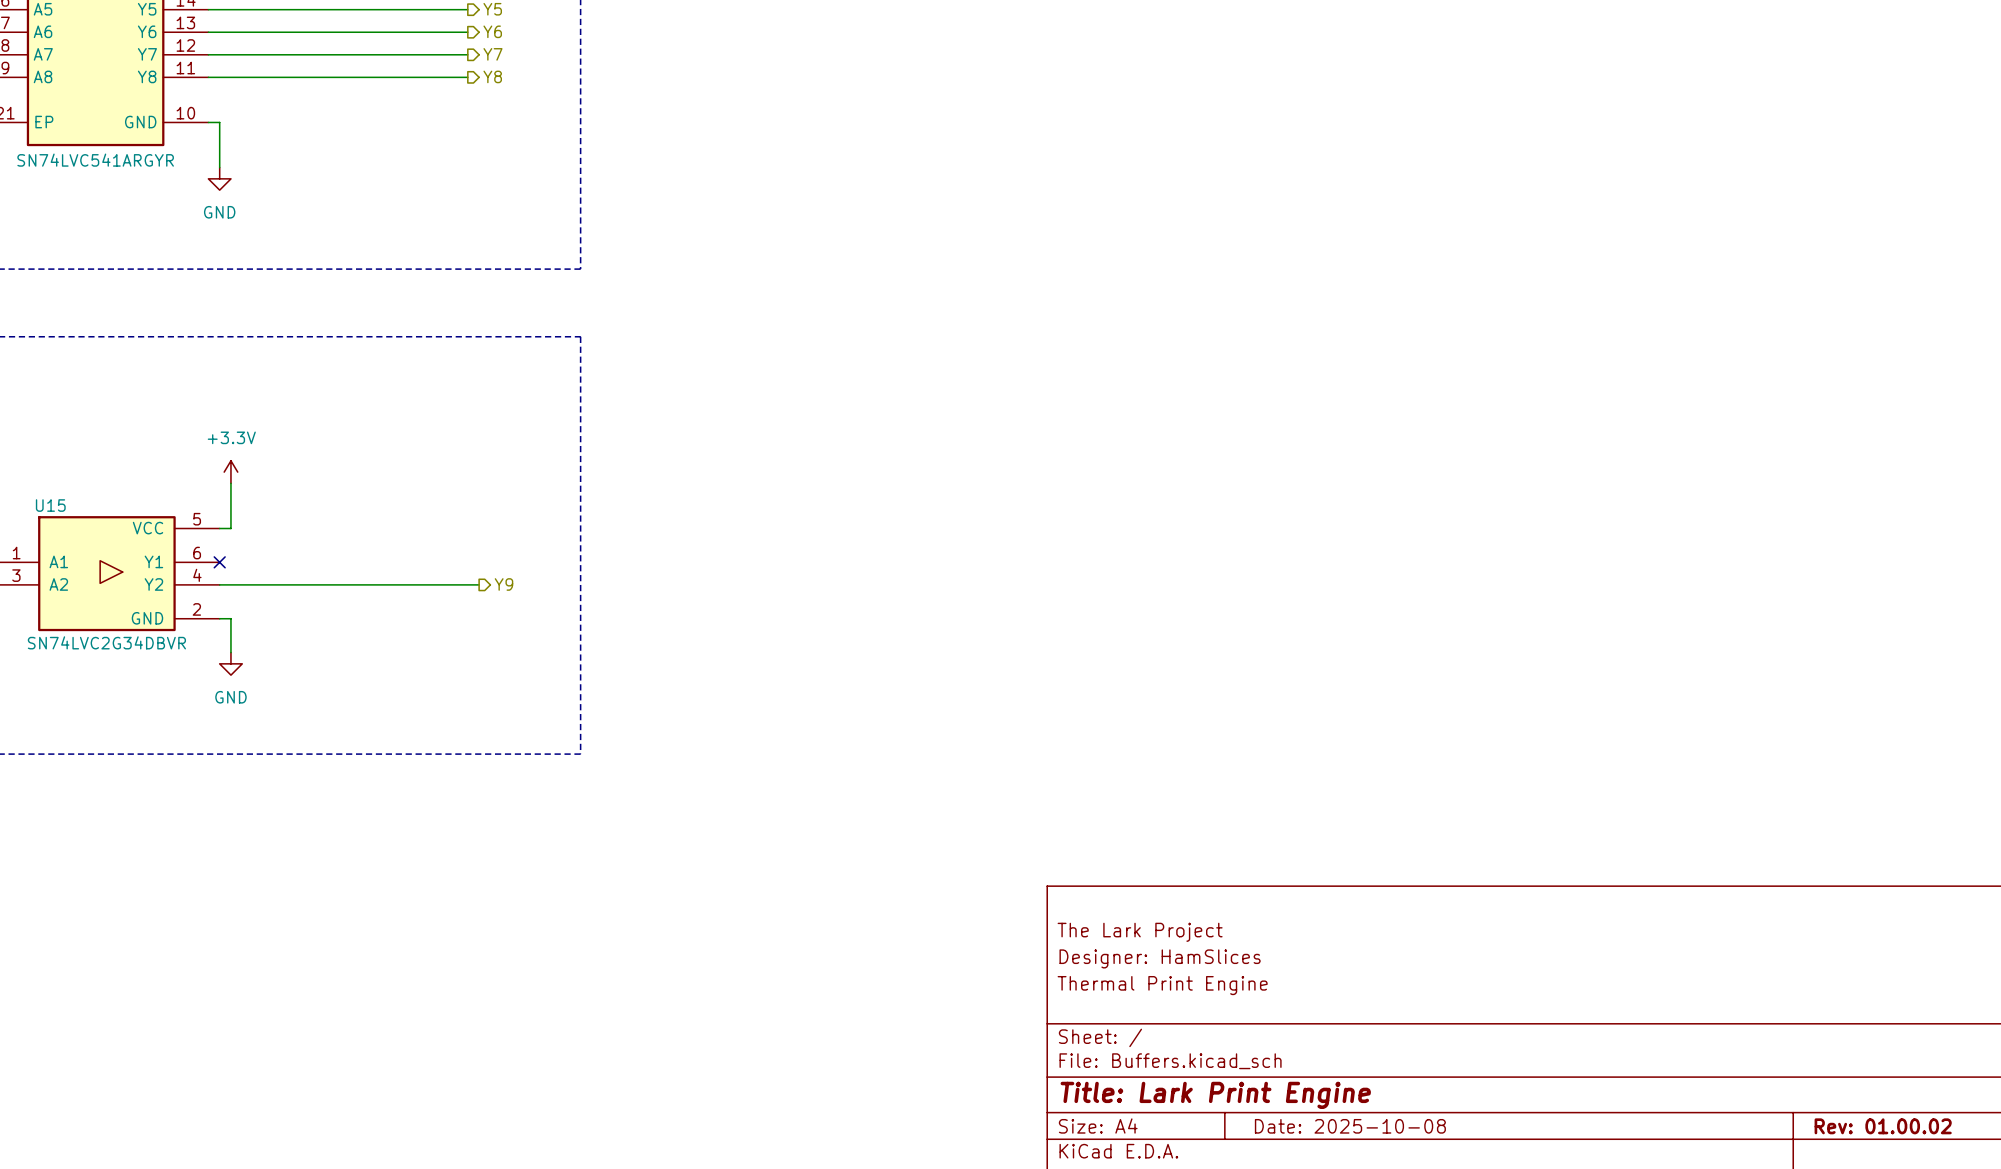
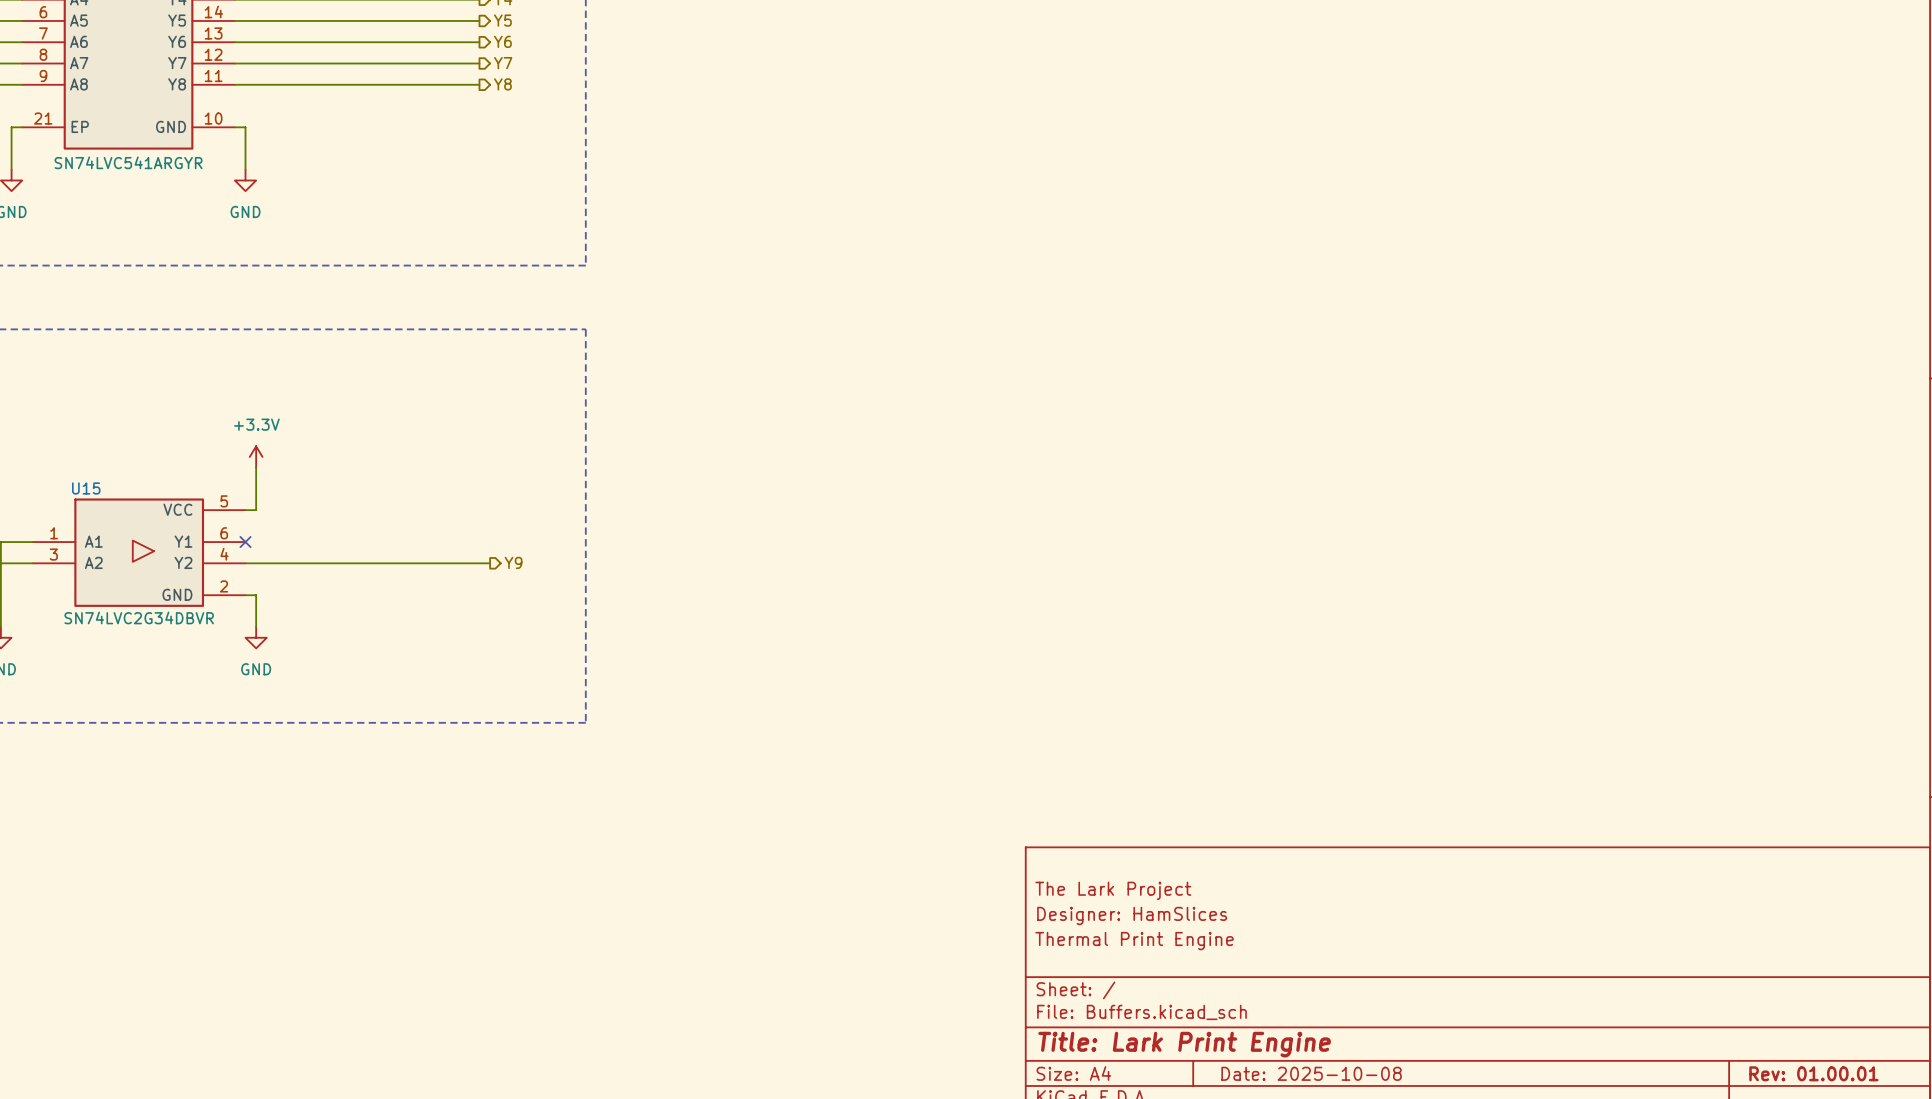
title block: Rev: 01.00.02 (1883, 1126) -> Rev: 01.00.01 (1813, 1073)

